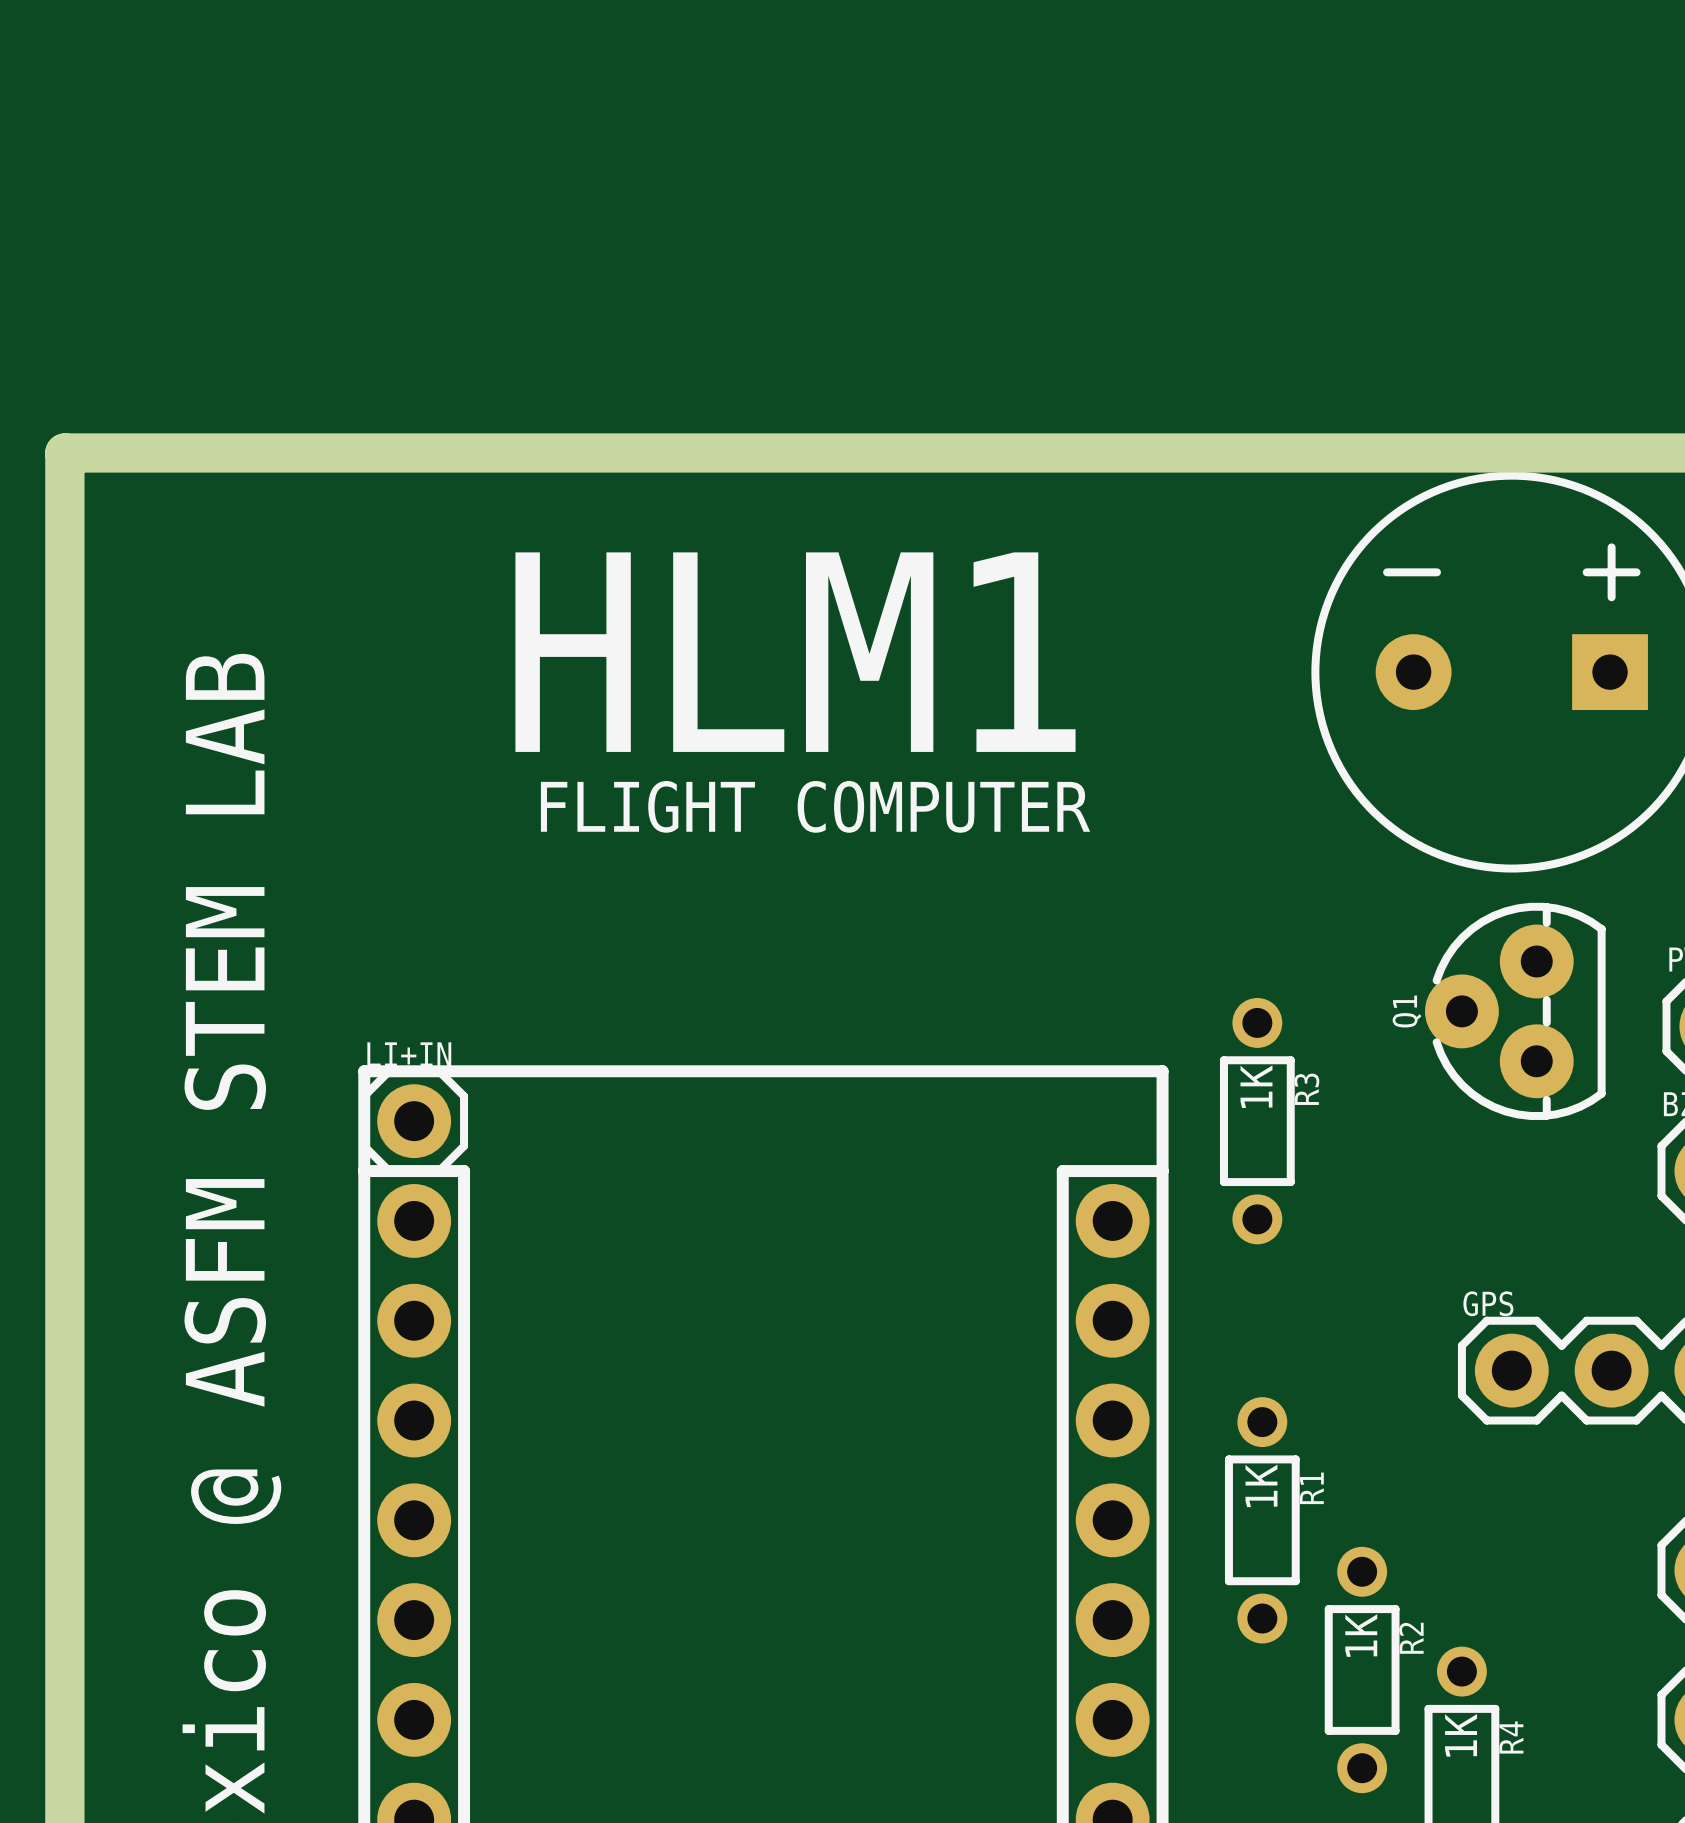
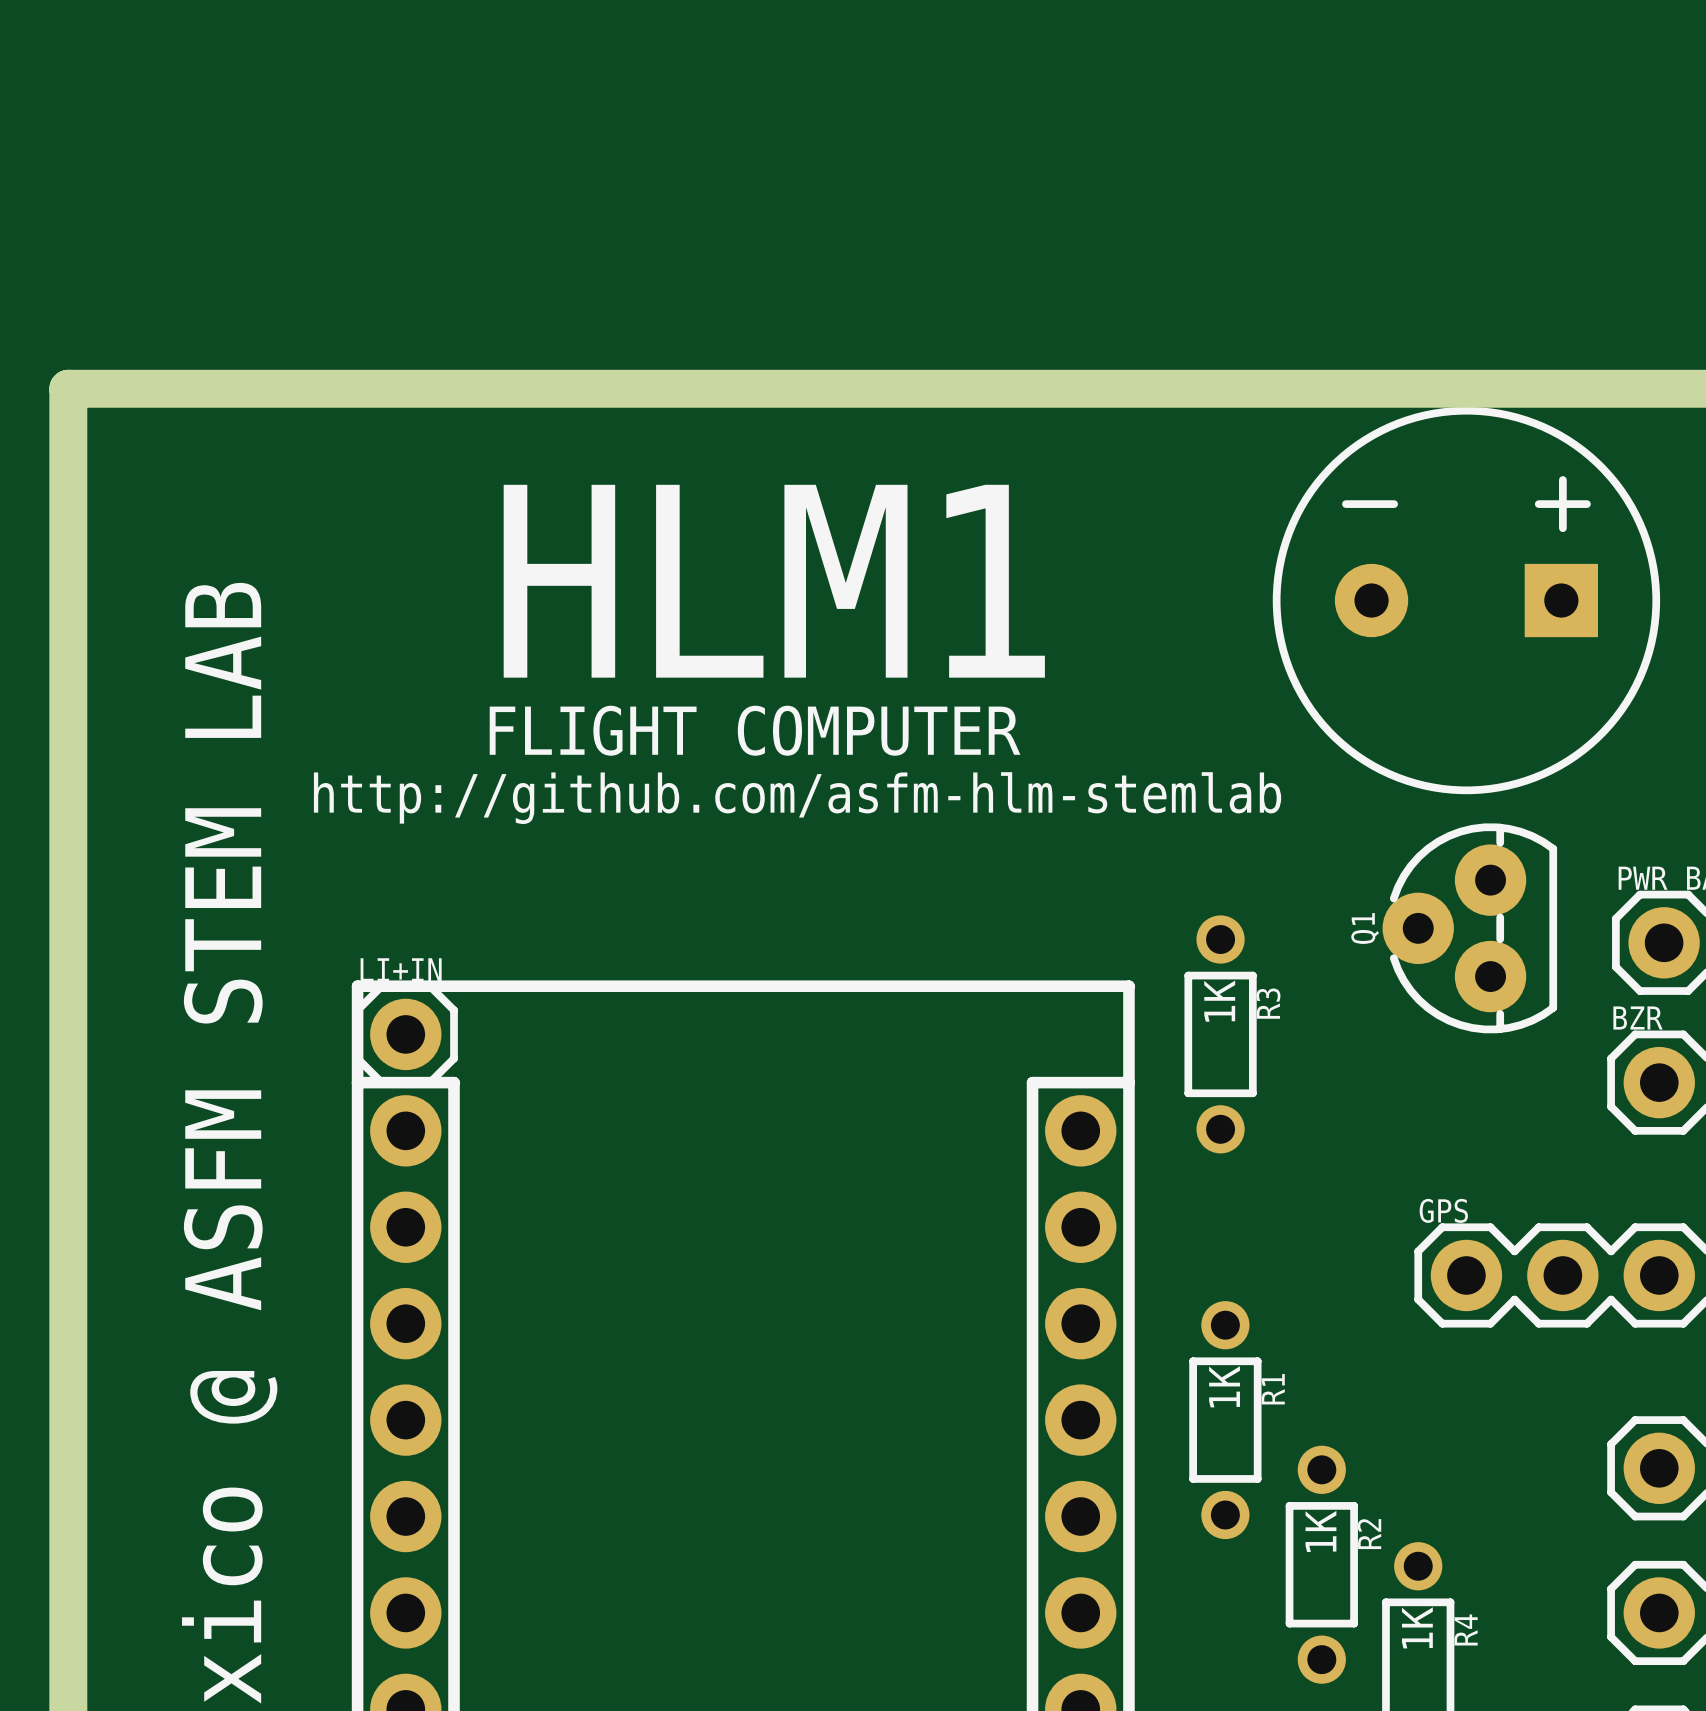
text position: FLIGHT COMPUTER (815, 806) -> FLIGHT COMPUTER (755, 730)
text: none -> http://github.com/asfm-hlm-stemlab (797, 798)

